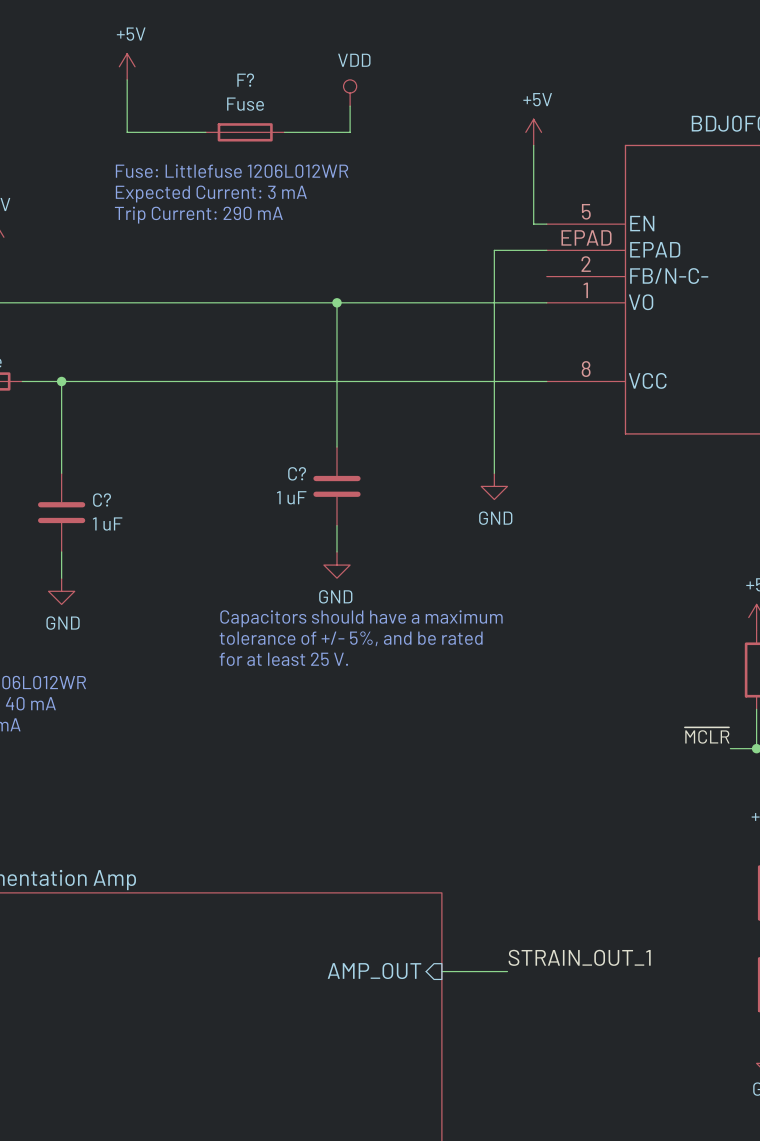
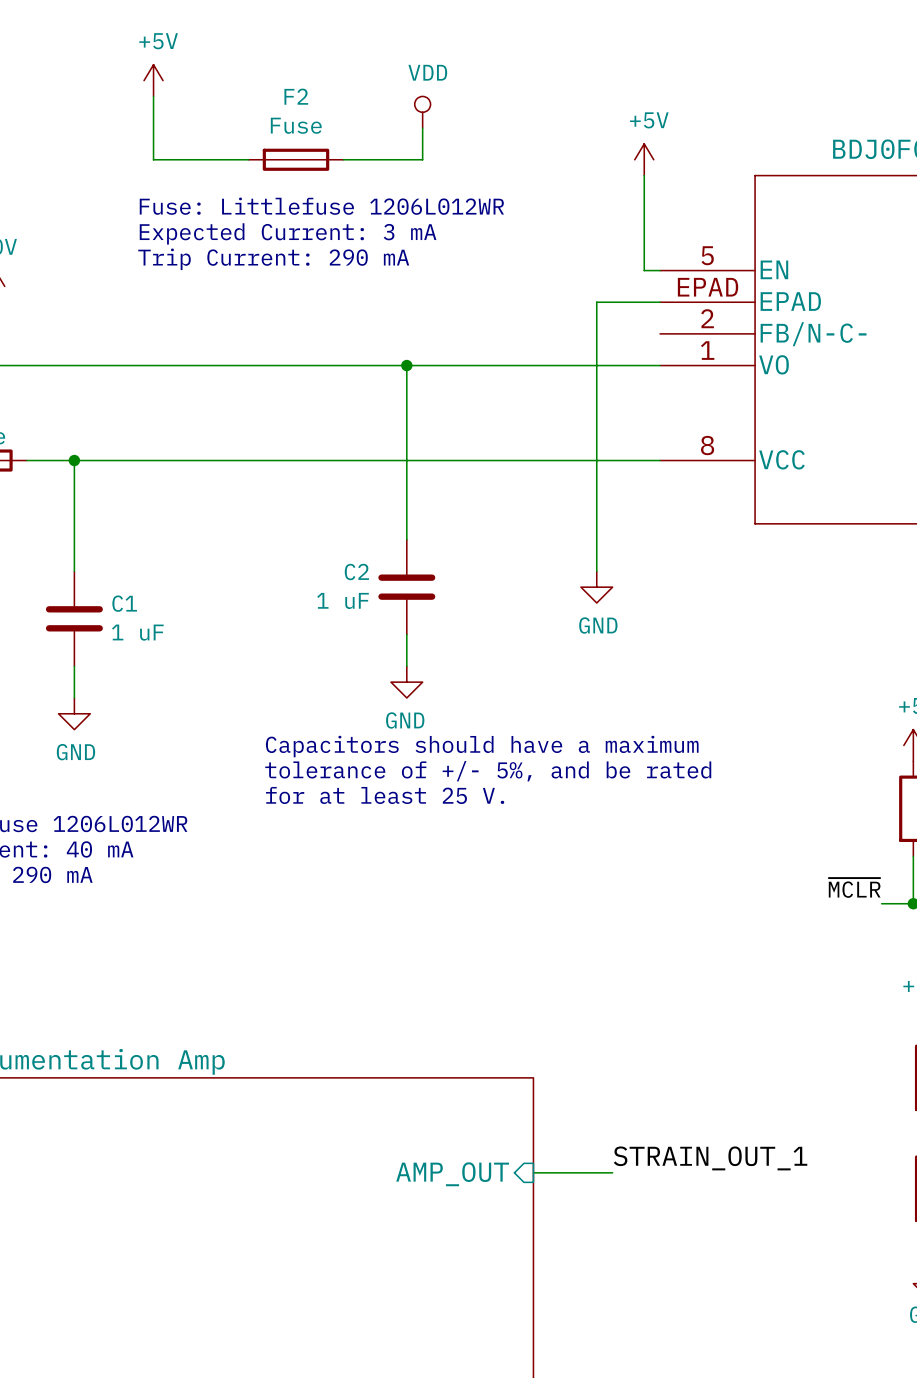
F? name: F? (245, 80) -> F2 (296, 96)
C? name: C? (297, 473) -> C2 (356, 572)
C? name: C? (102, 500) -> C1 (124, 603)

